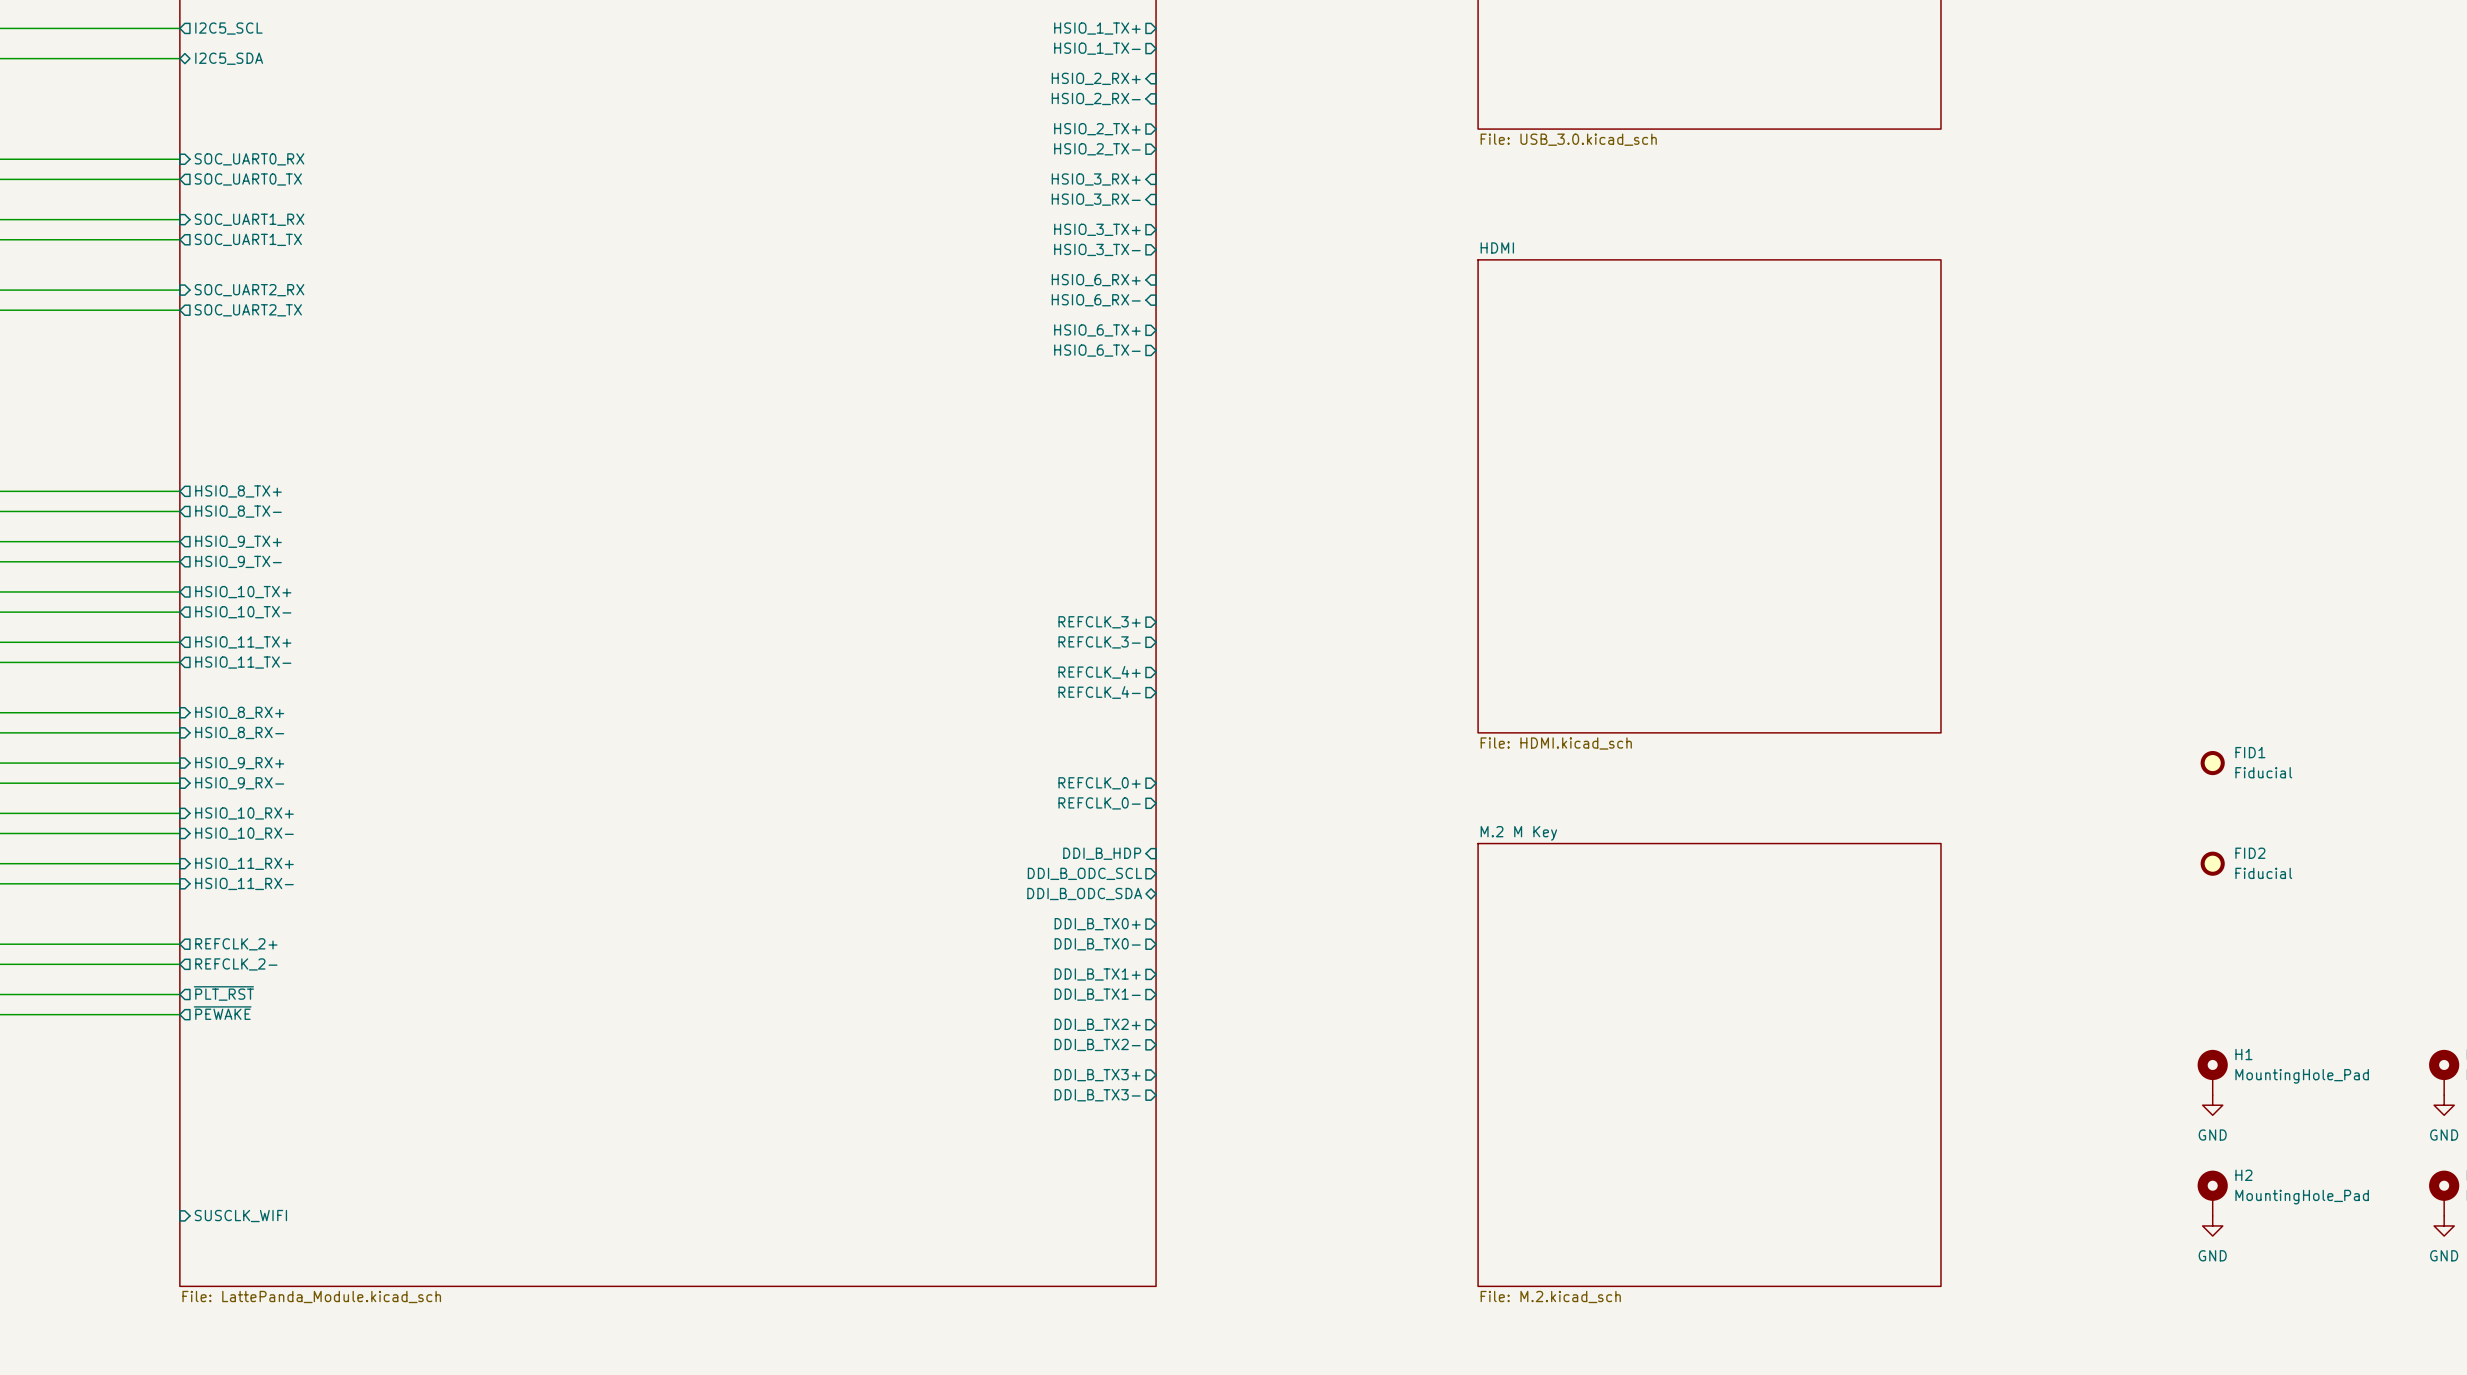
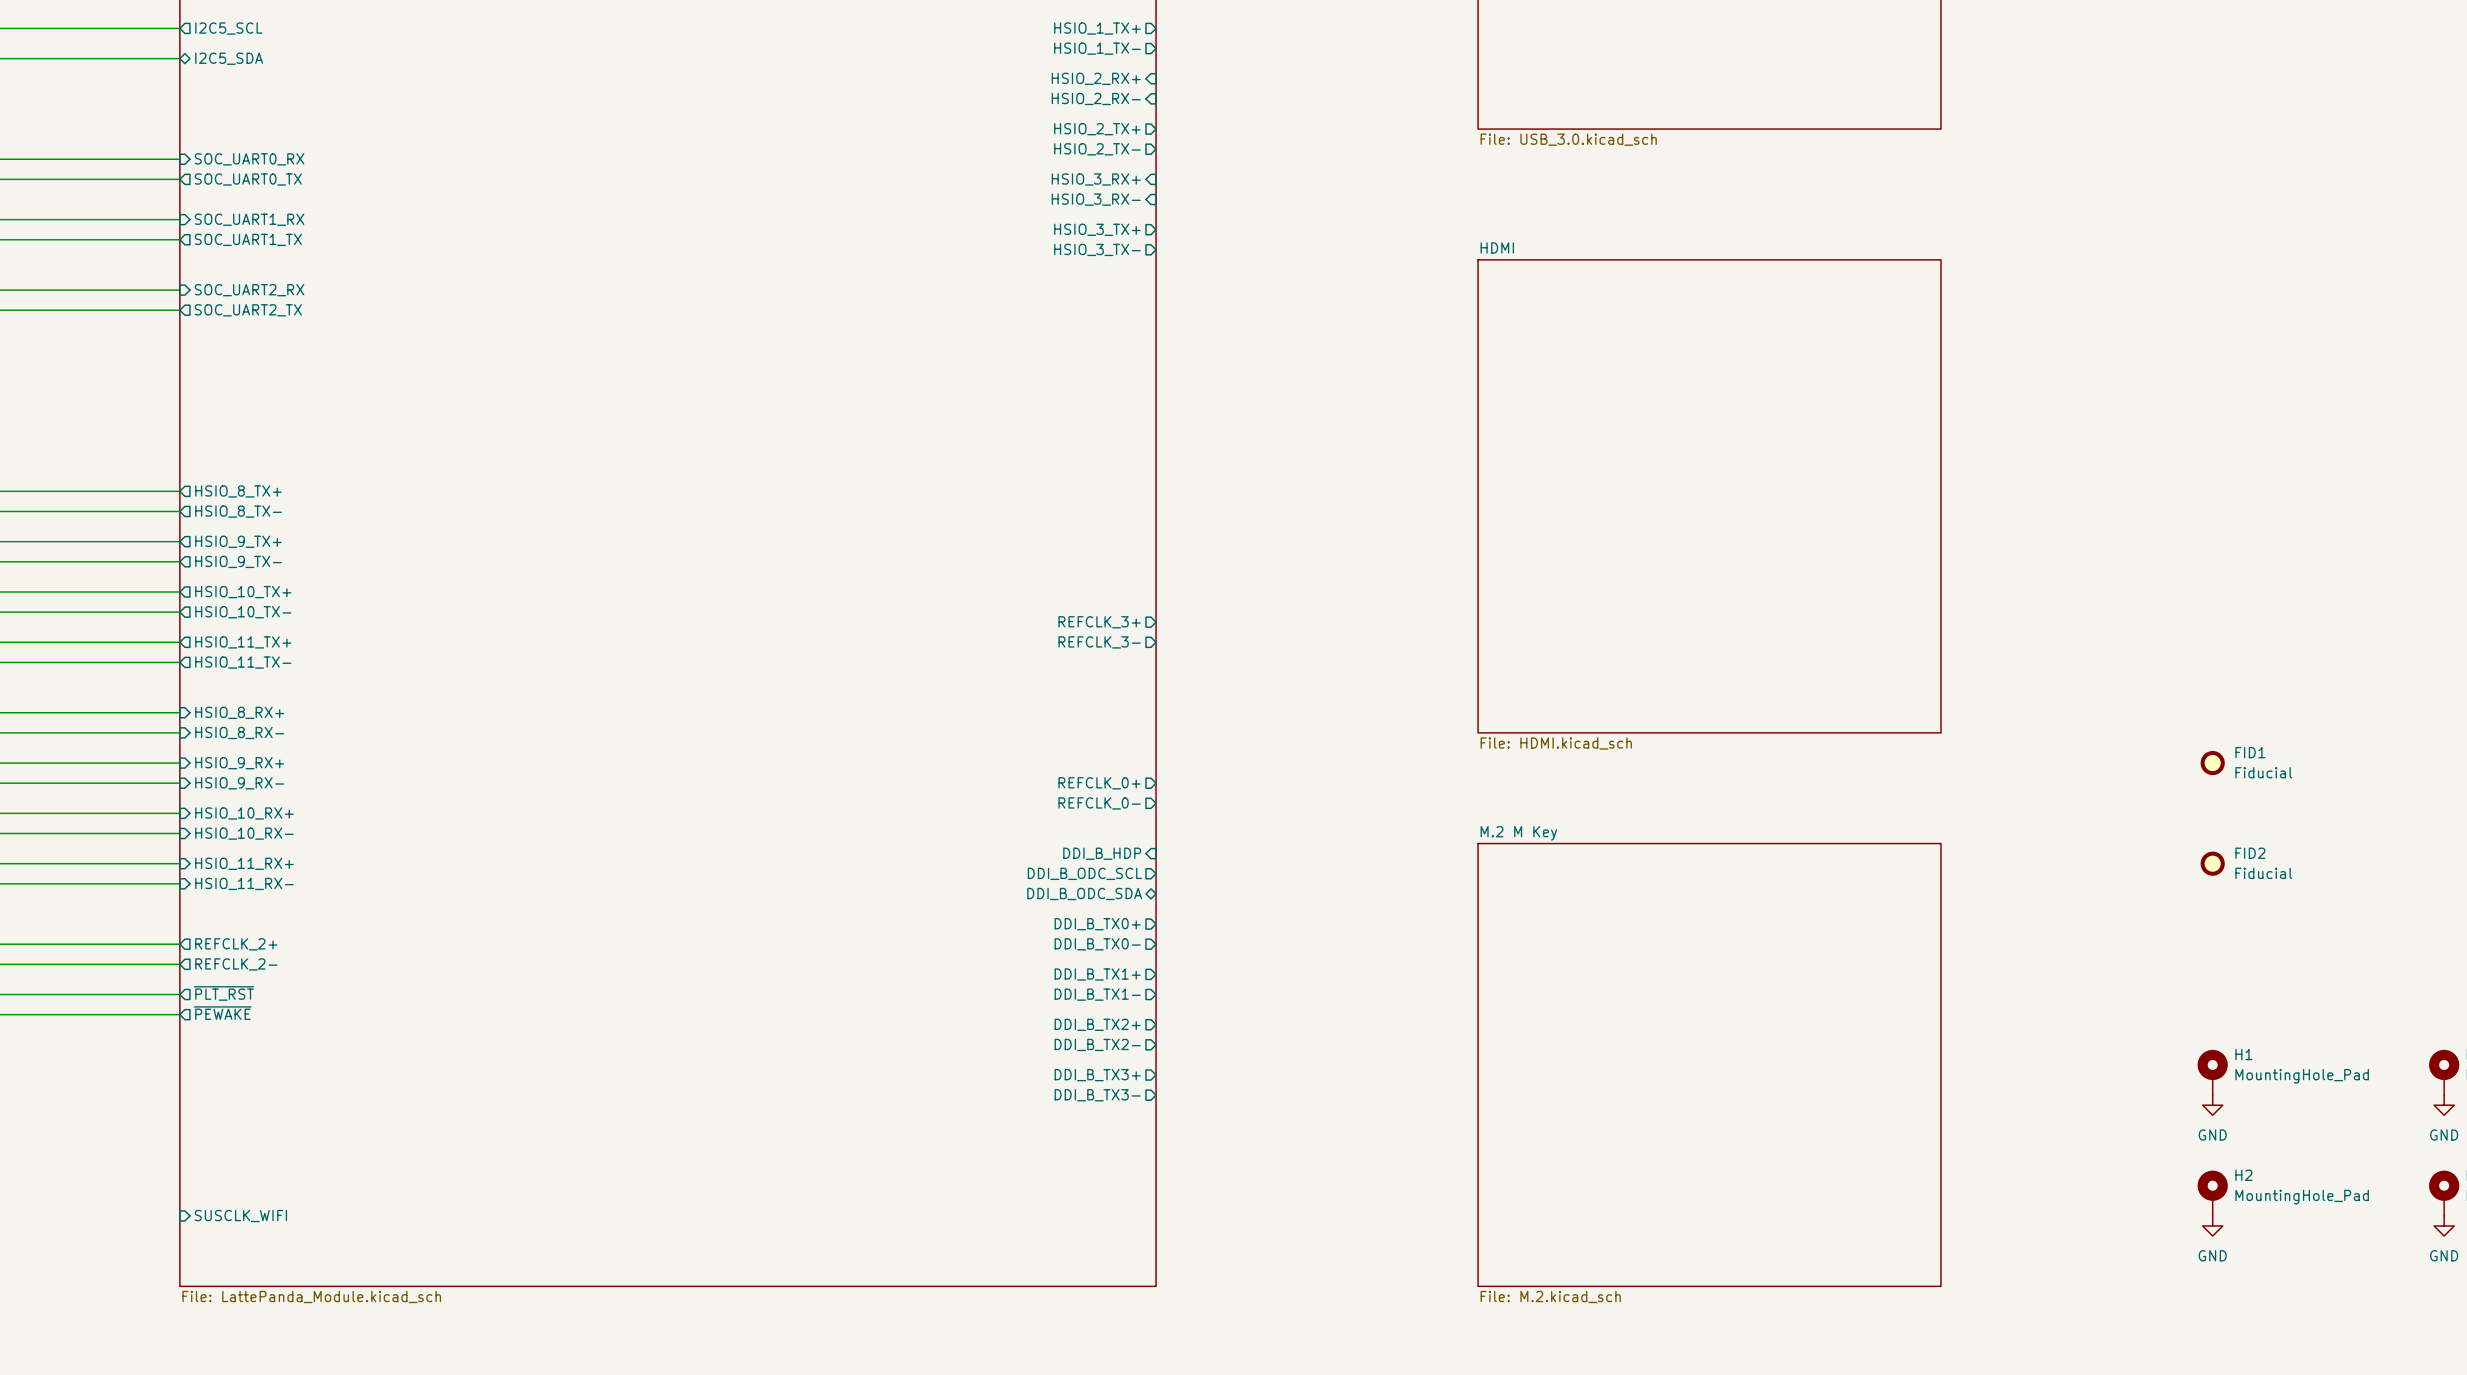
sheet pin: HSIO_6_RX+ (1096, 280) -> none
sheet pin: HSIO_6_RX- (1096, 300) -> none
sheet pin: HSIO_6_TX+ (1097, 330) -> none
sheet pin: HSIO_6_TX- (1097, 350) -> none
sheet pin: REFCLK_4+ (1099, 672) -> none
sheet pin: REFCLK_4- (1099, 692) -> none

